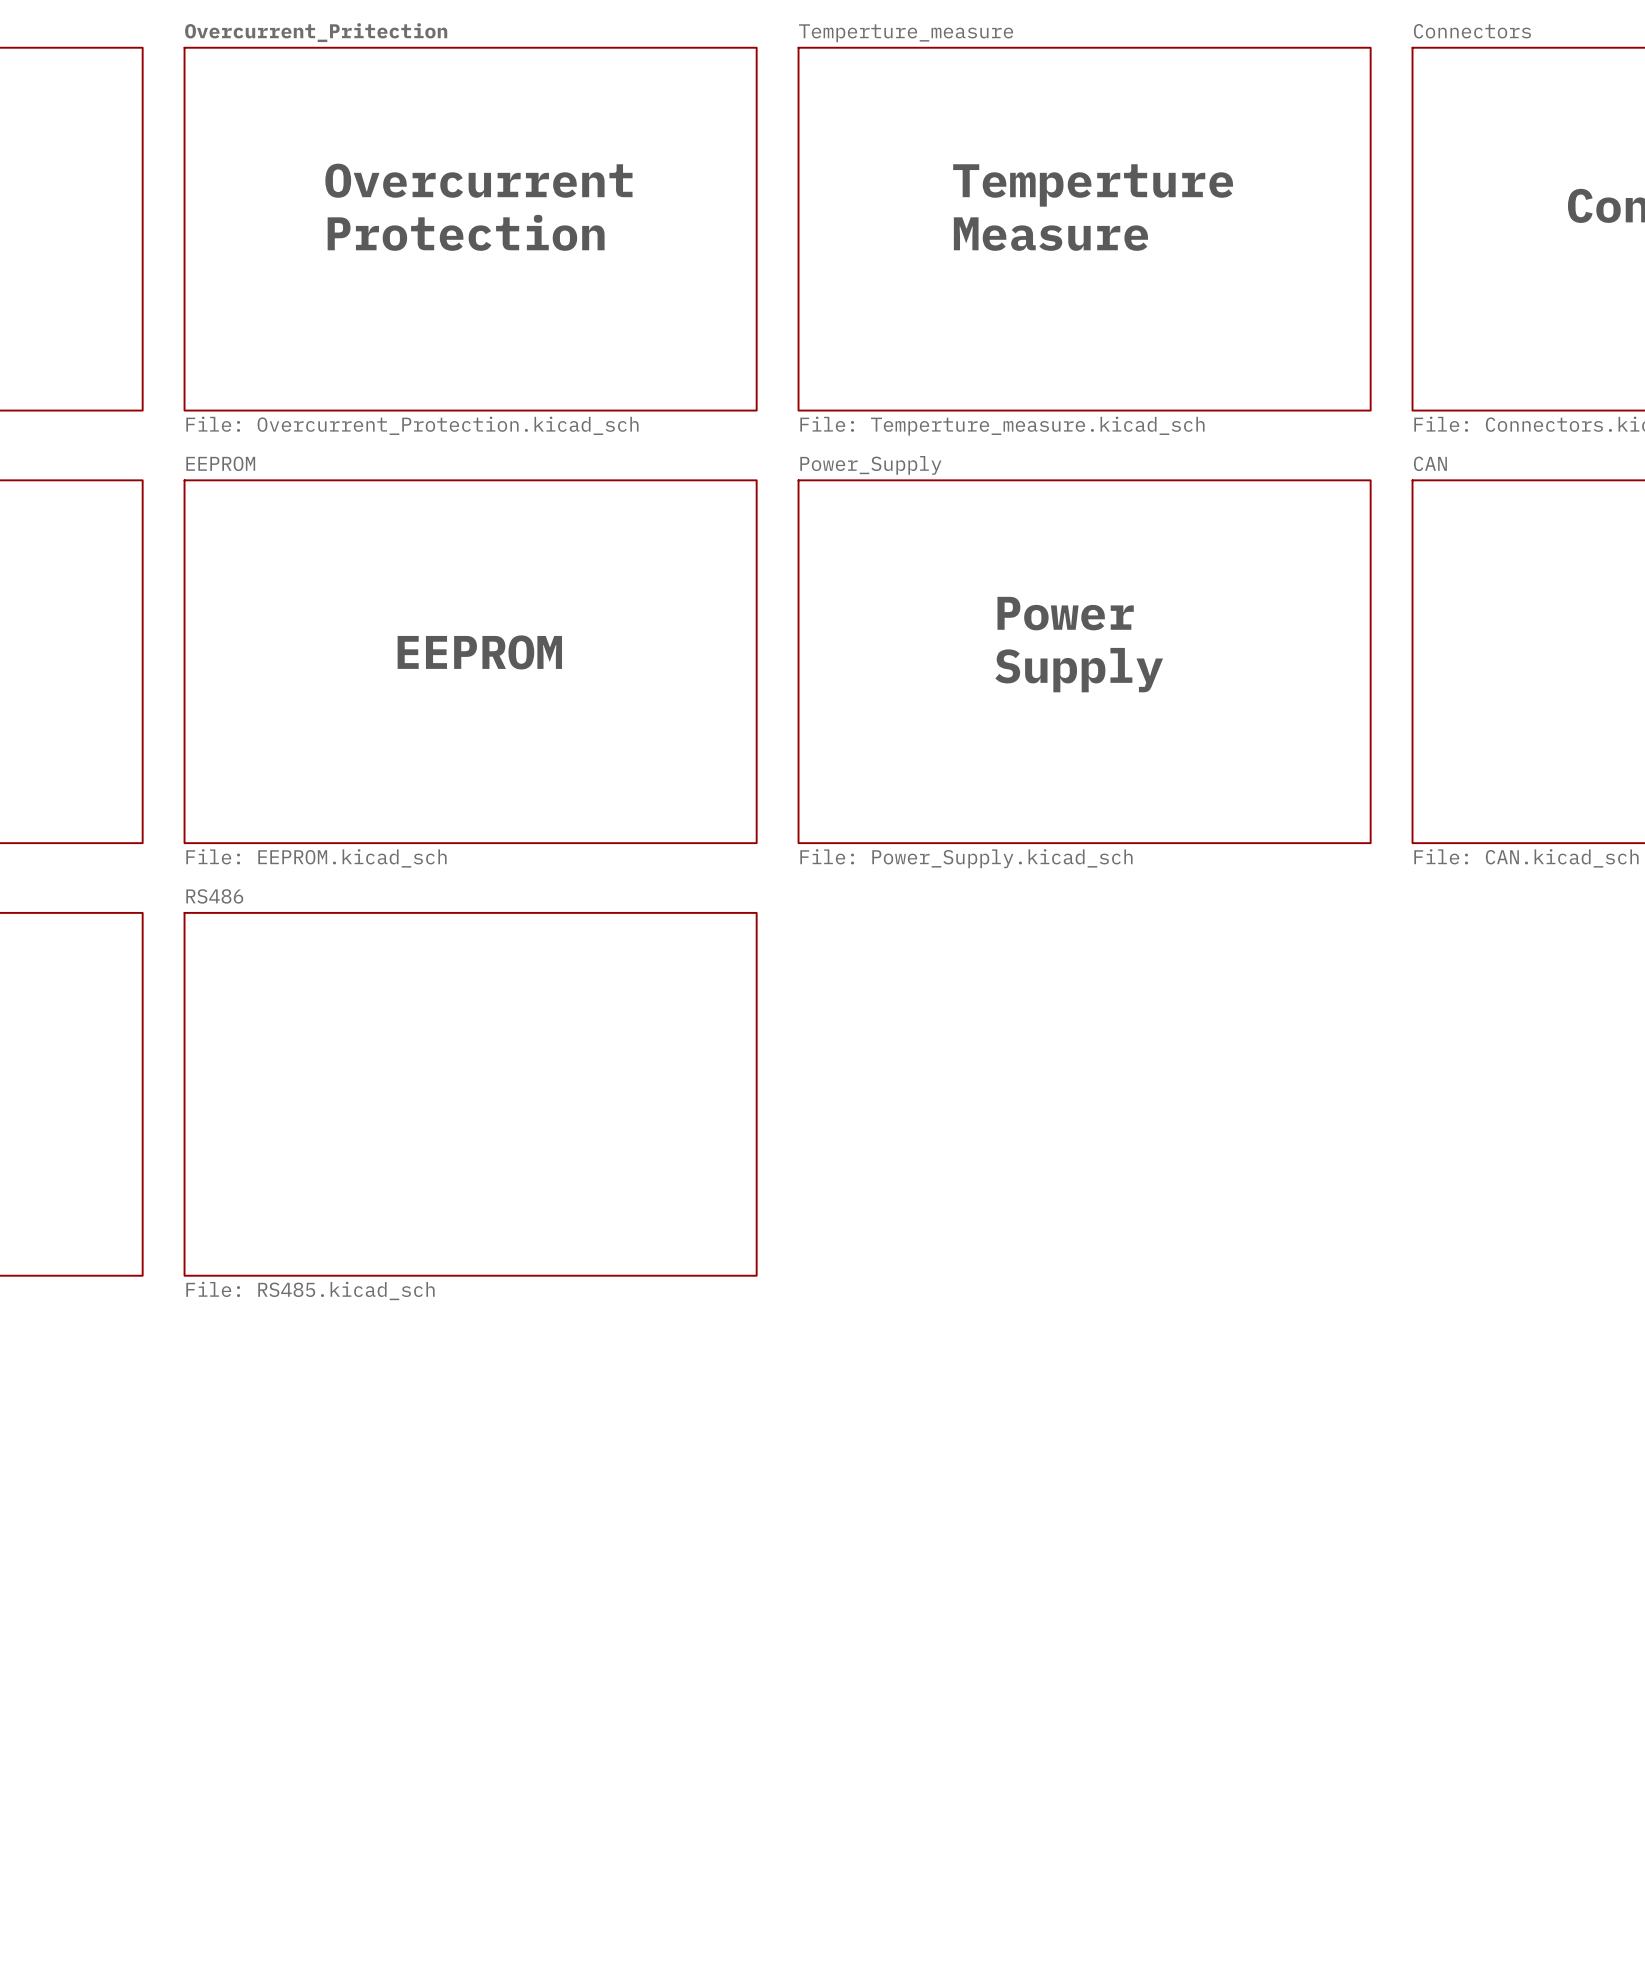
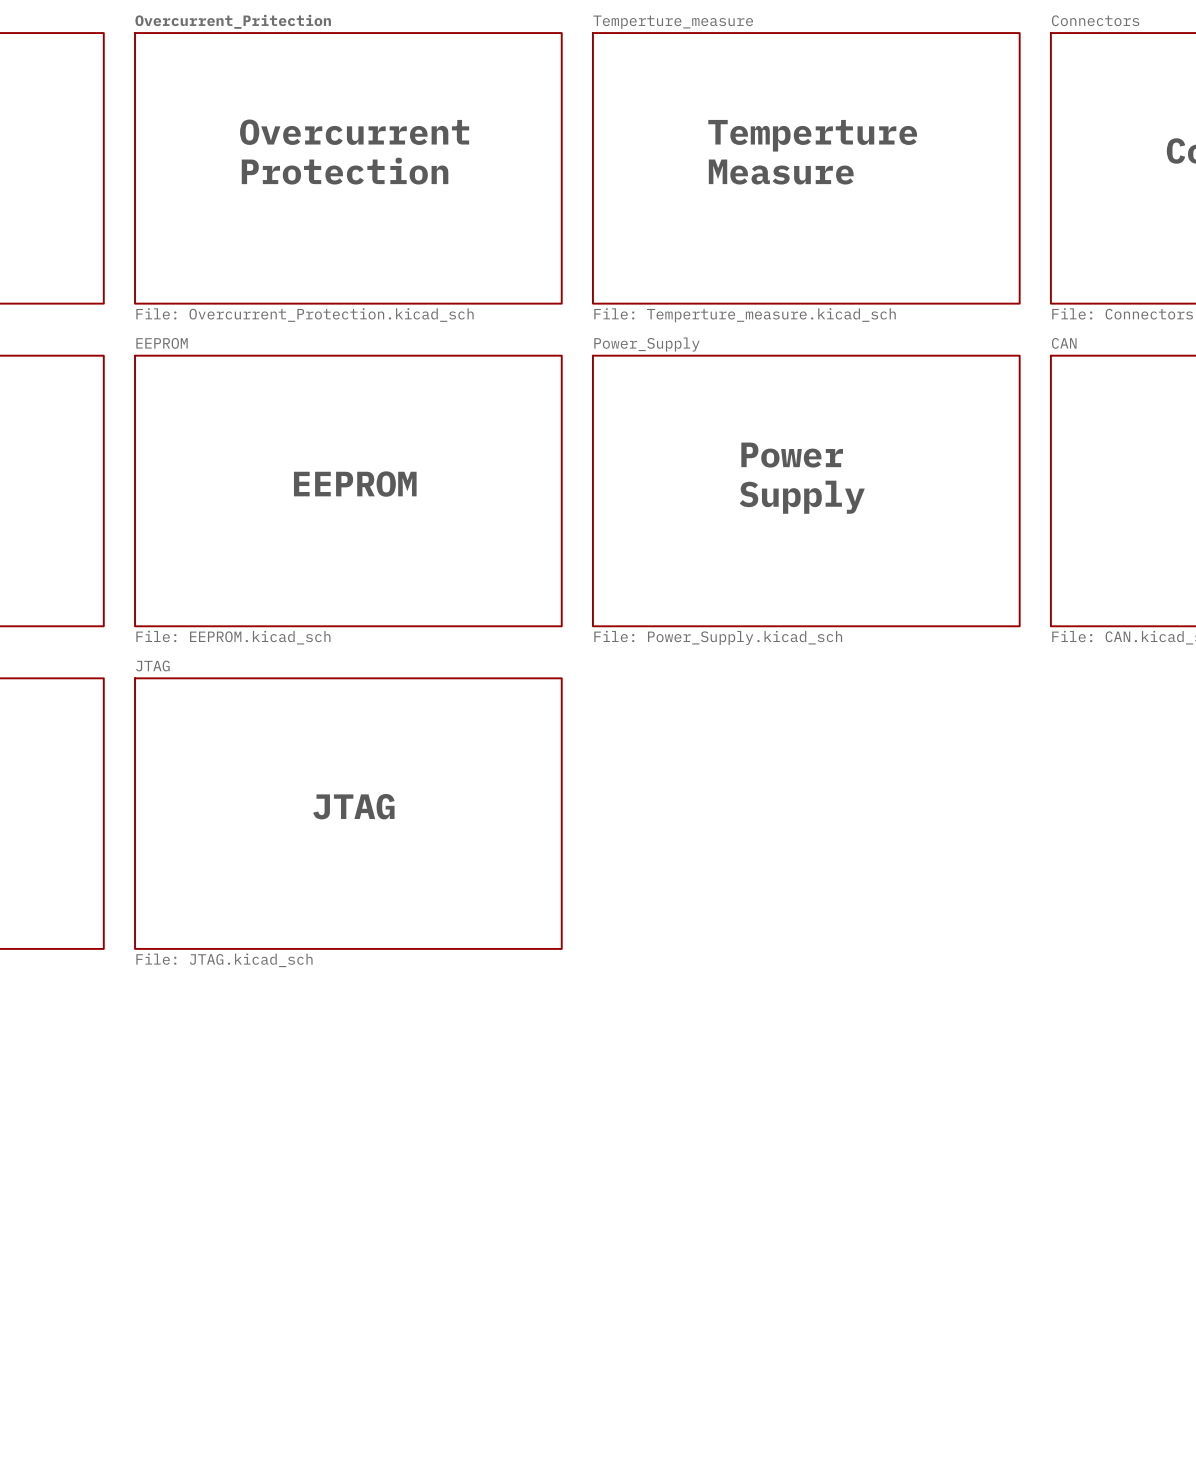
sheet RS486 name: RS486 (214, 896) -> JTAG (152, 666)
text: none -> JTAG (353, 806)
sheet RS486 value: File: RS485.kicad_sch (310, 1290) -> File: JTAG.kicad_sch (224, 960)

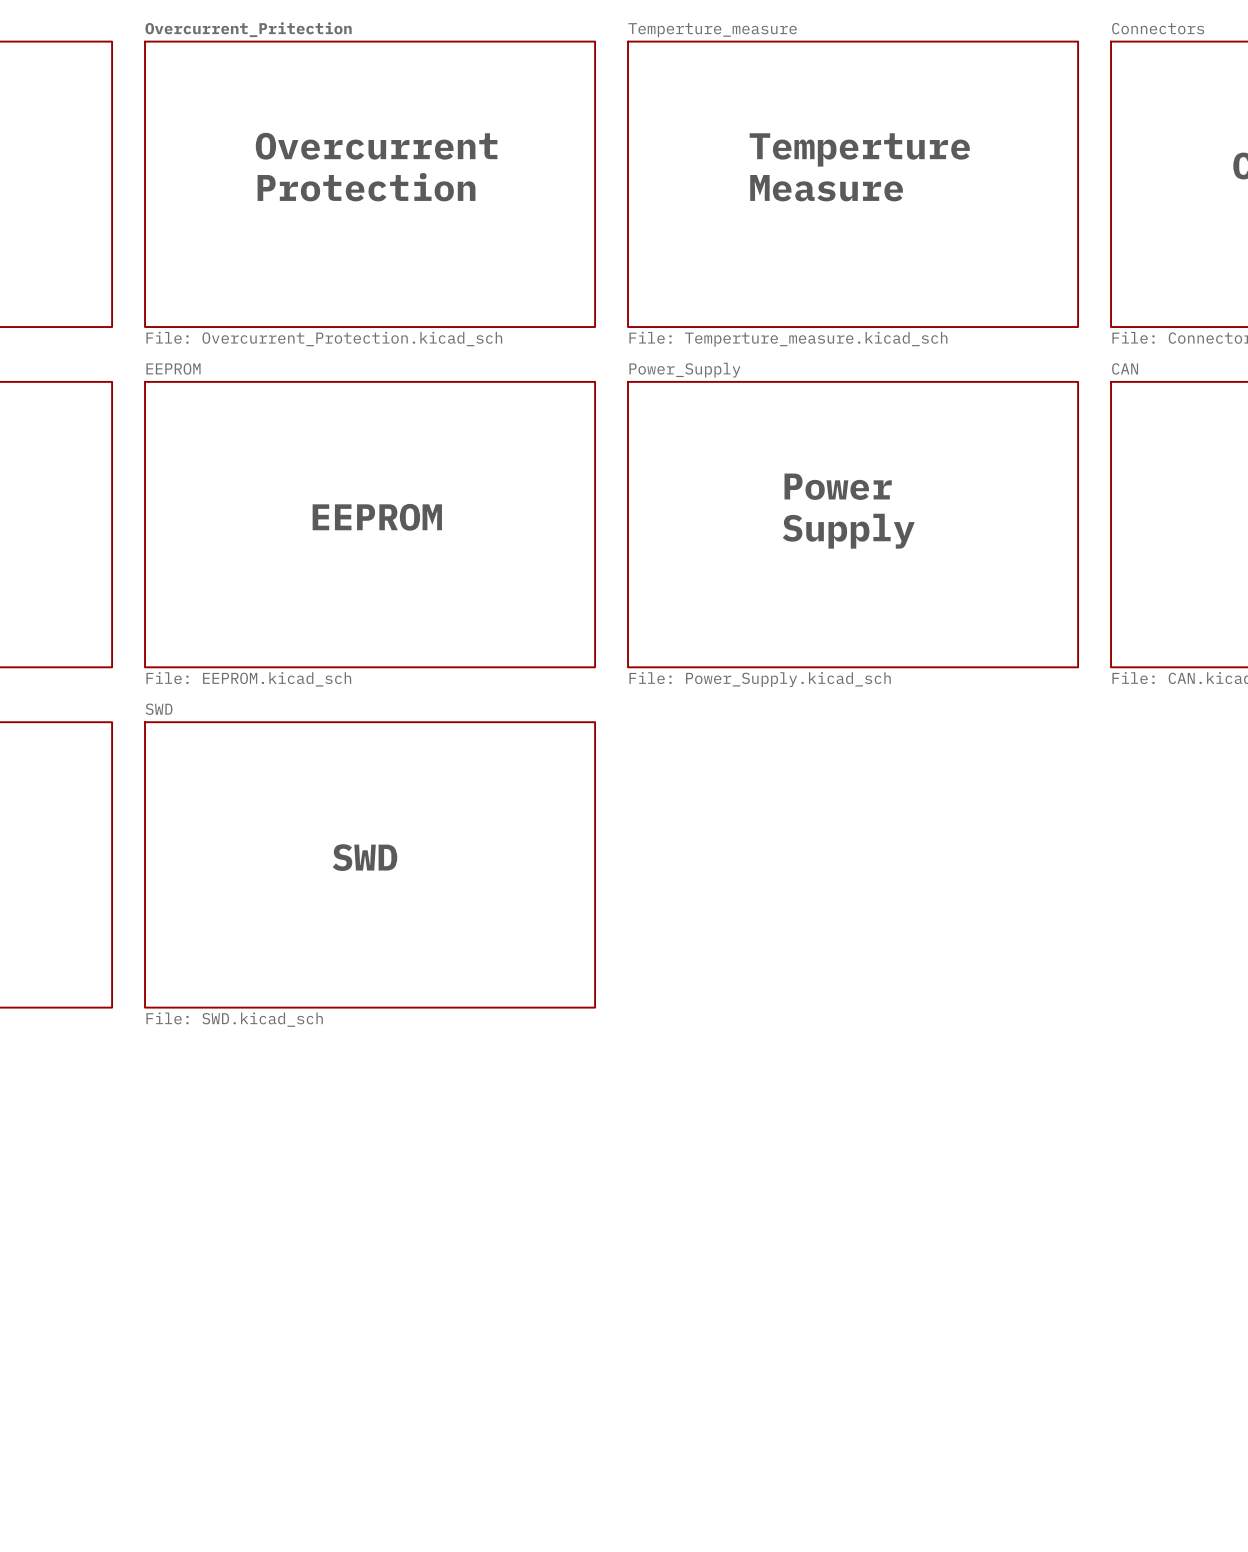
sheet JTAG name: JTAG (152, 666) -> SWD (159, 709)
text: JTAG (353, 806) -> SWD (365, 857)
sheet JTAG value: File: JTAG.kicad_sch (224, 960) -> File: SWD.kicad_sch (234, 1019)

